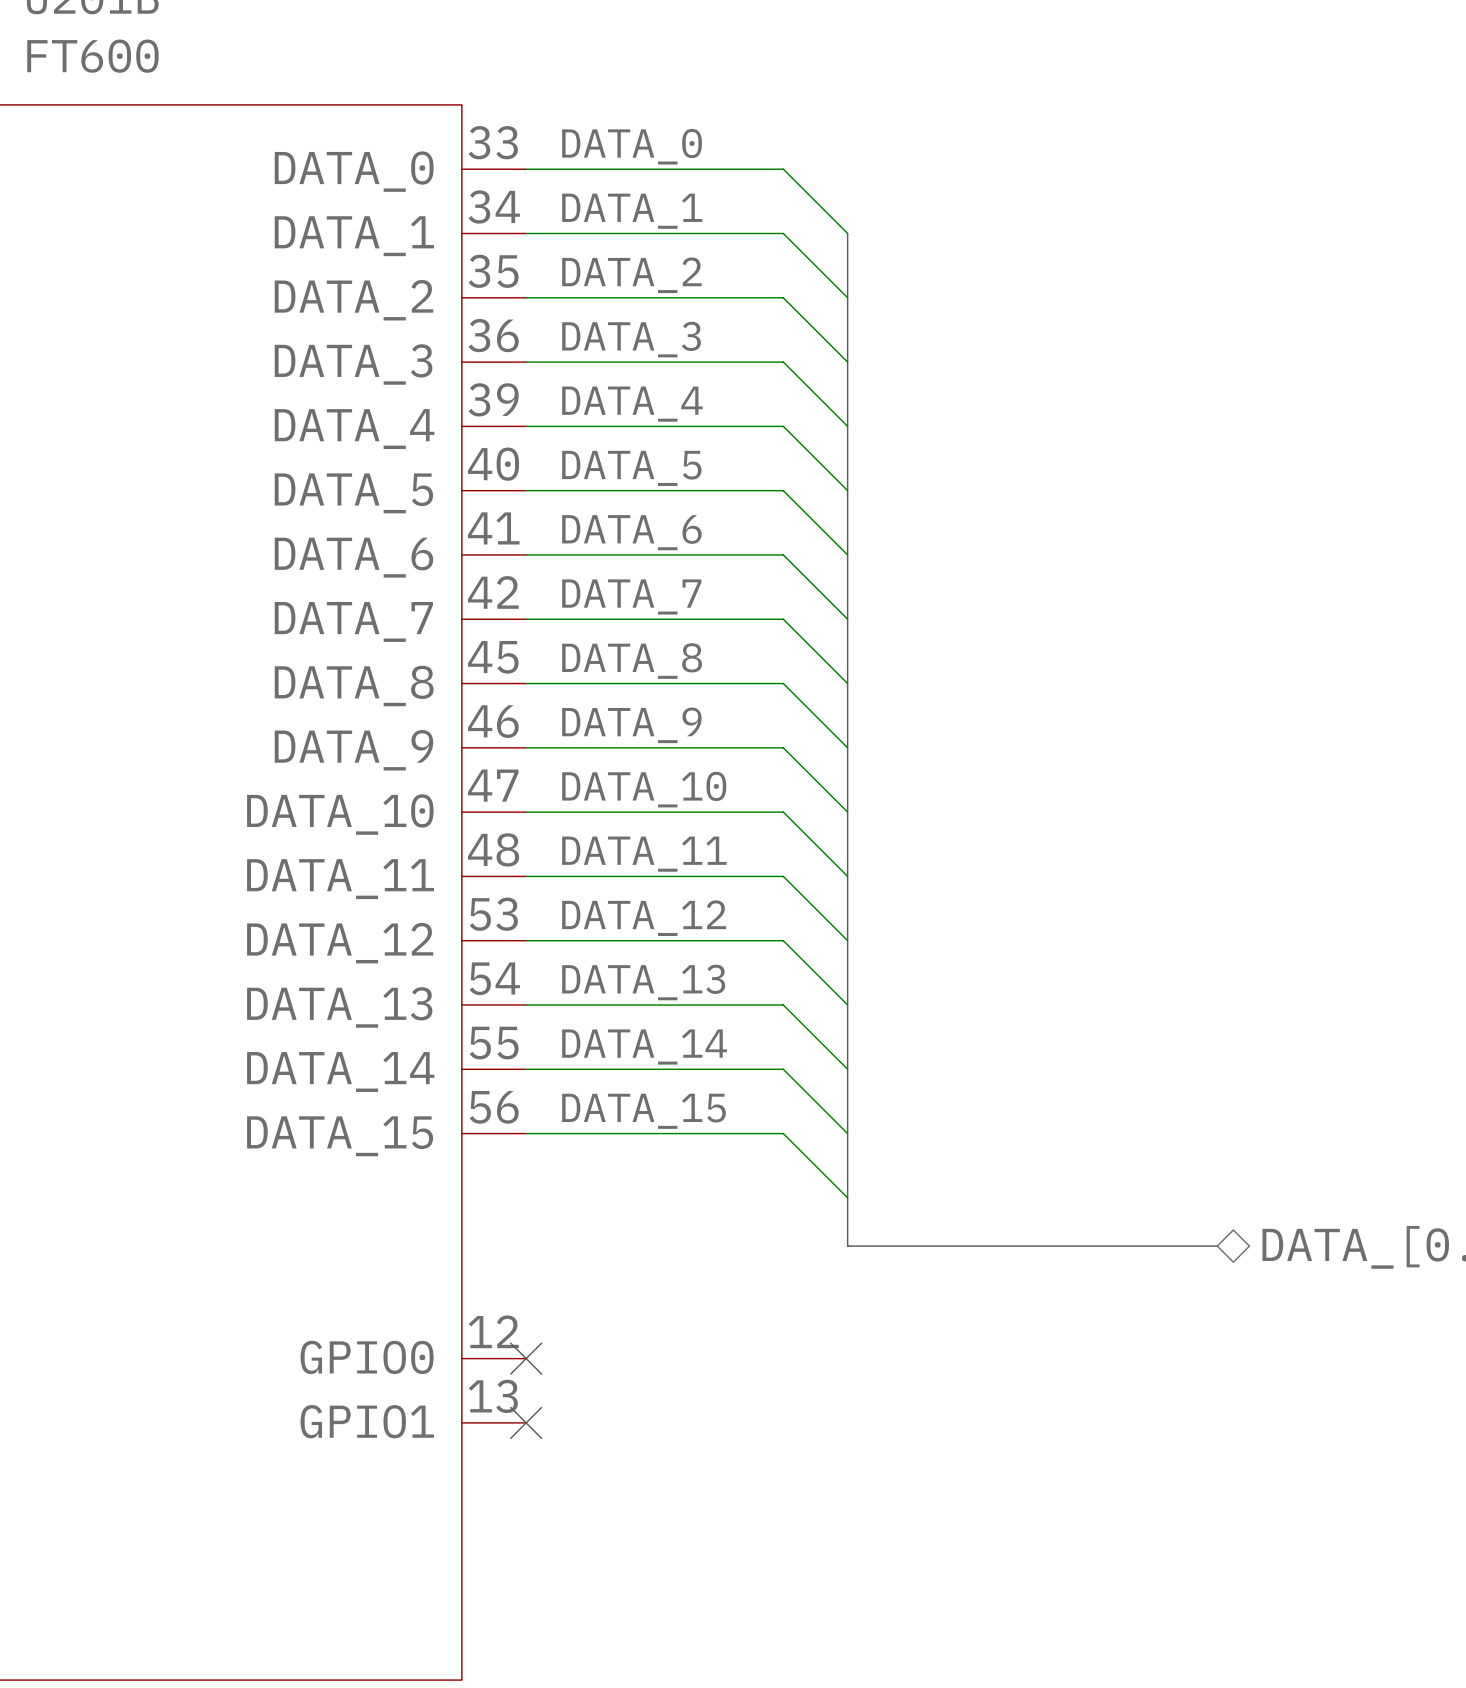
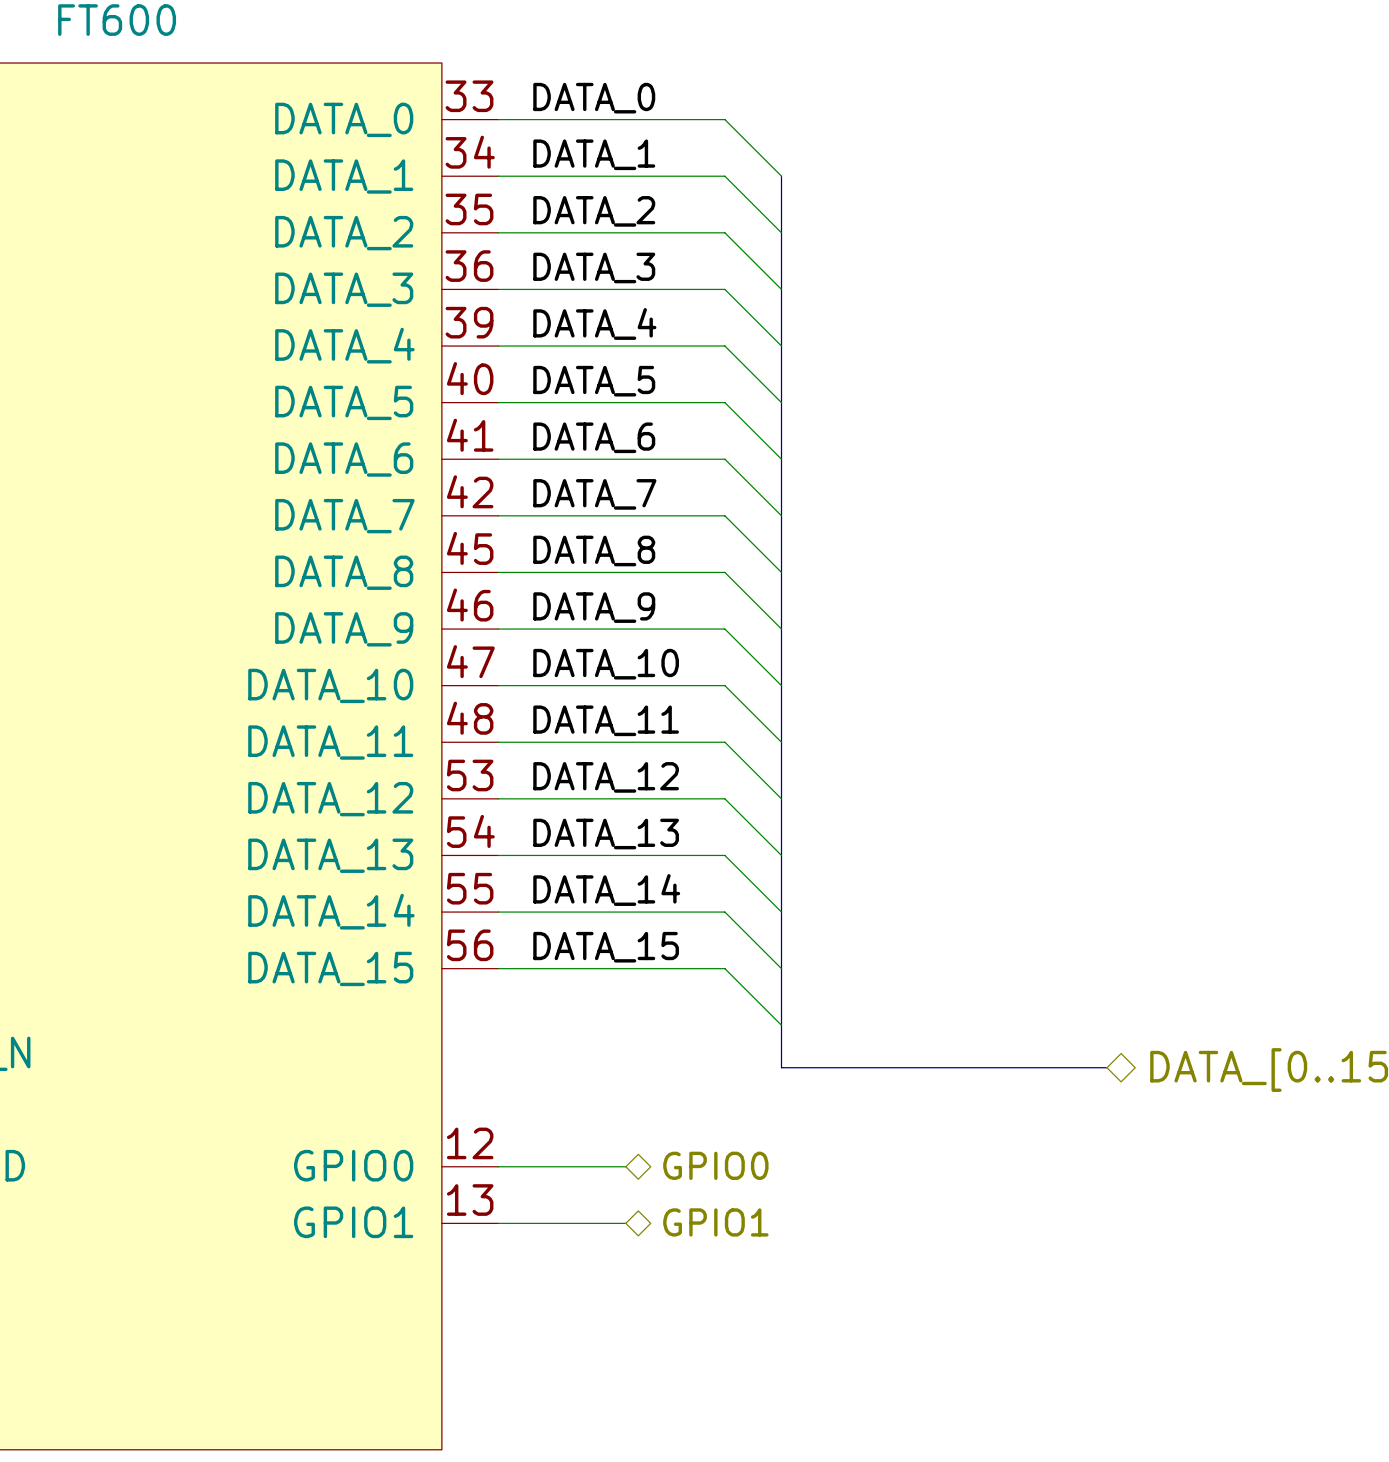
hierarchical label: none -> GPIO0 (715, 1165)
wire: none -> (498, 1166) (625, 1166)
no-connect mark: (526, 1358) -> none
hierarchical label: none -> GPIO1 (715, 1222)
wire: none -> (498, 1223) (625, 1223)
no-connect mark: (526, 1422) -> none

